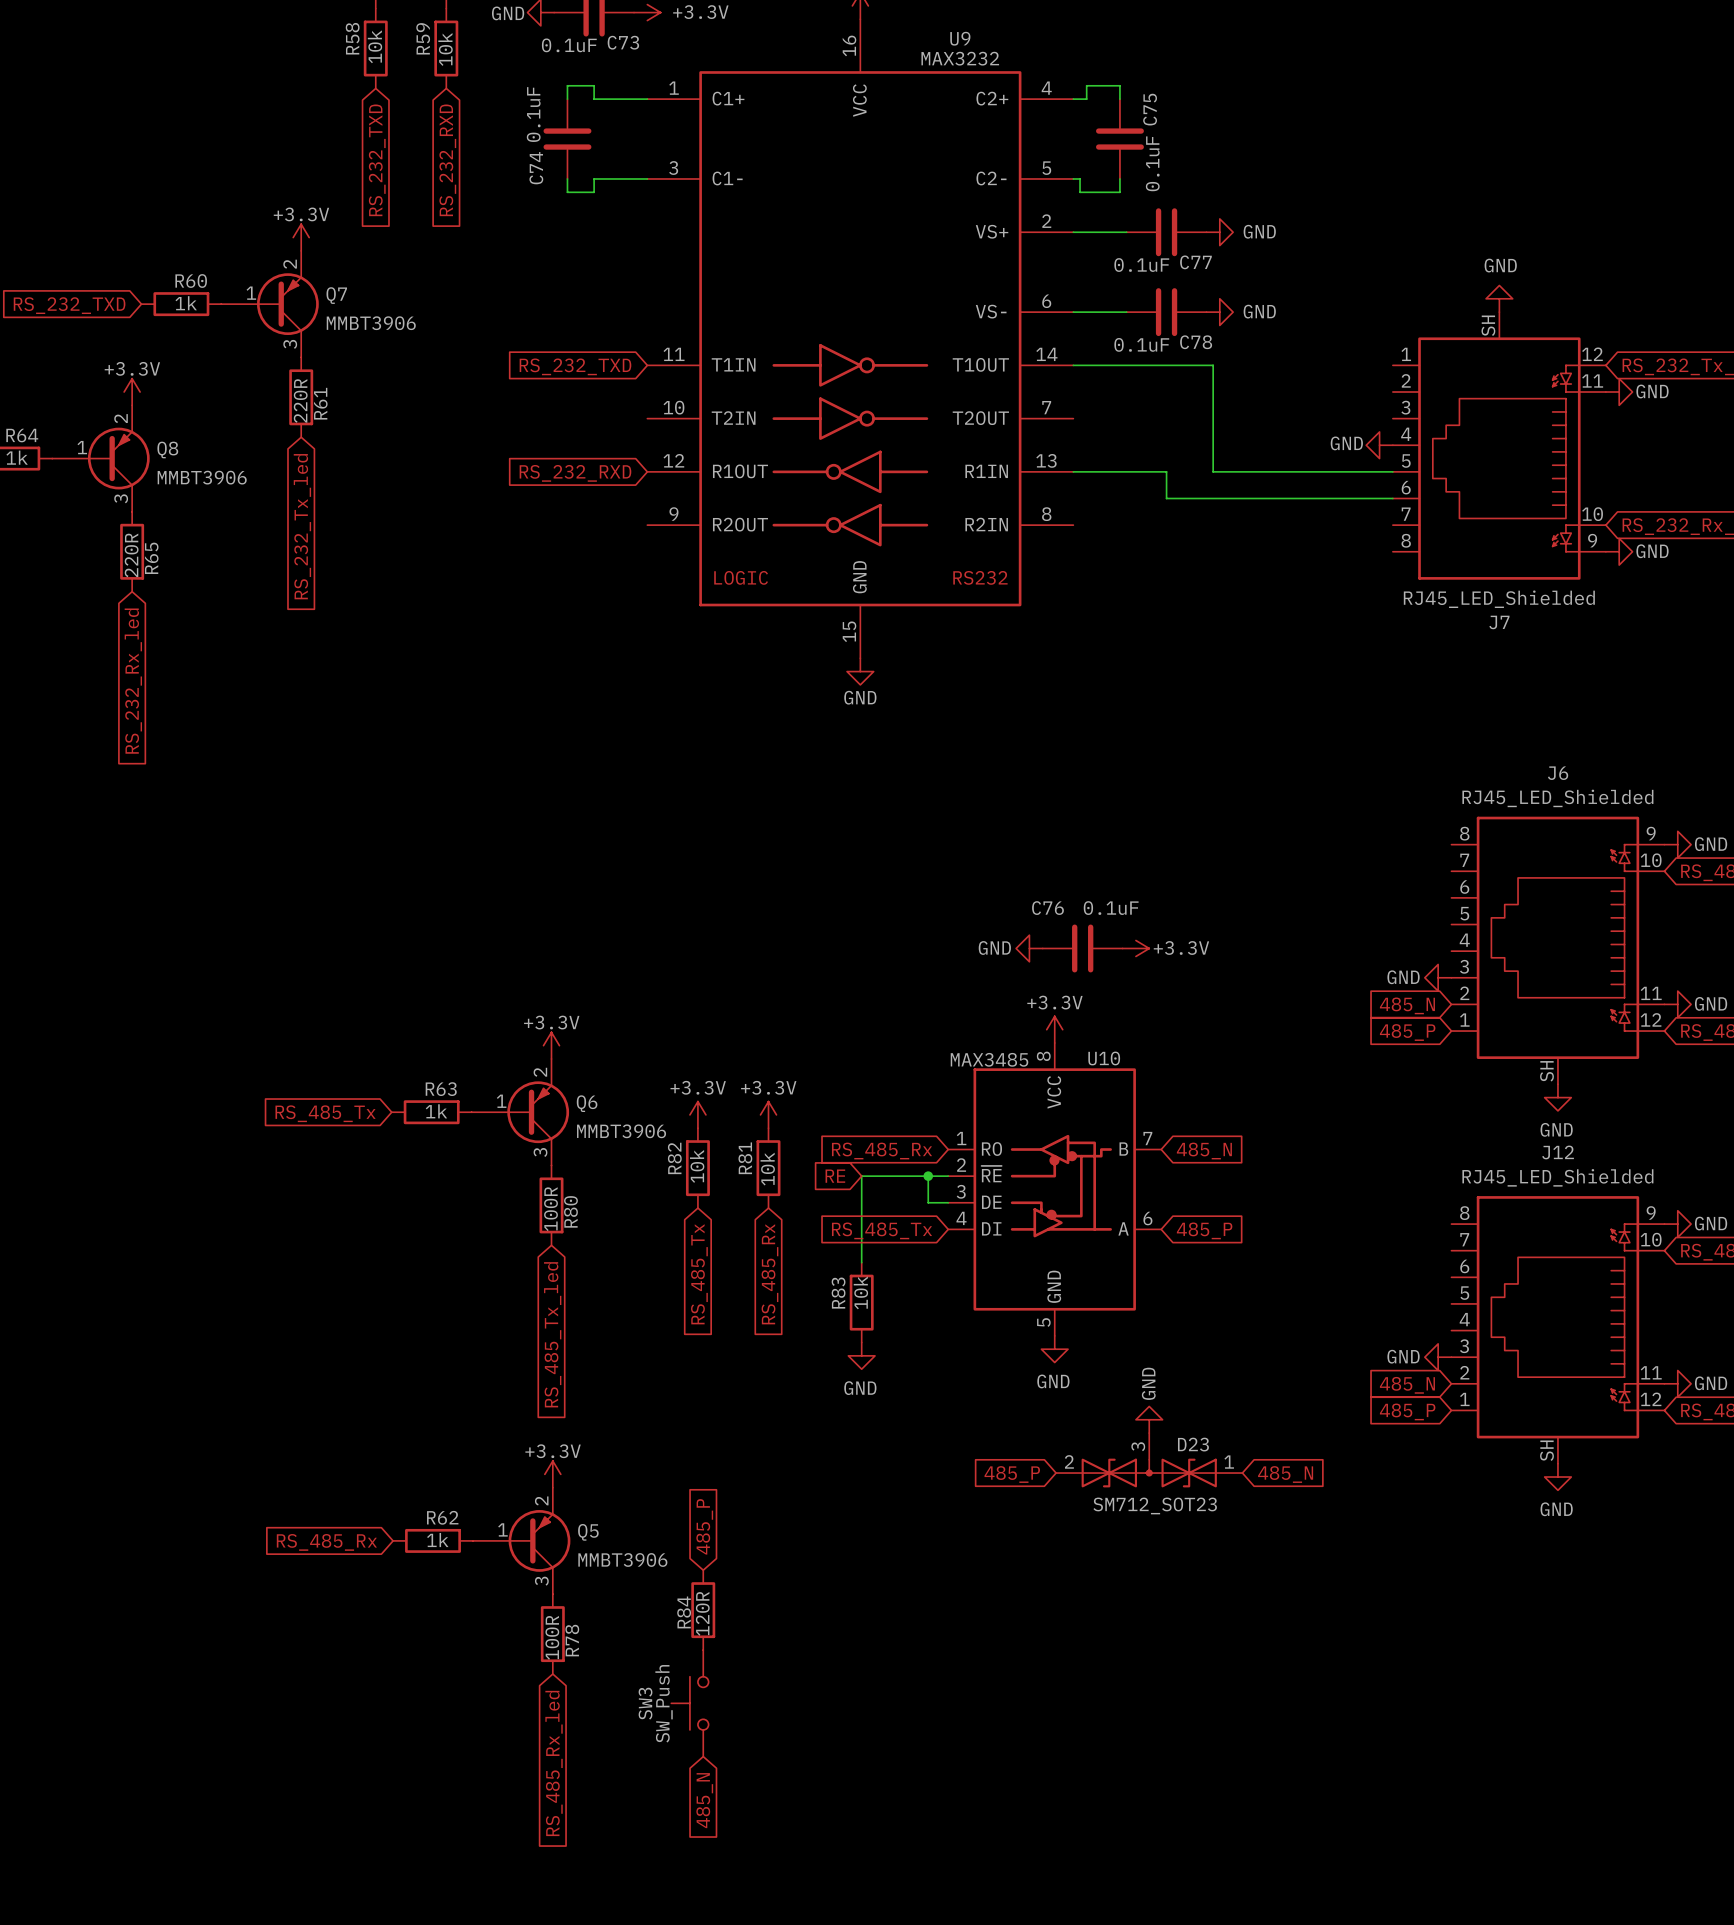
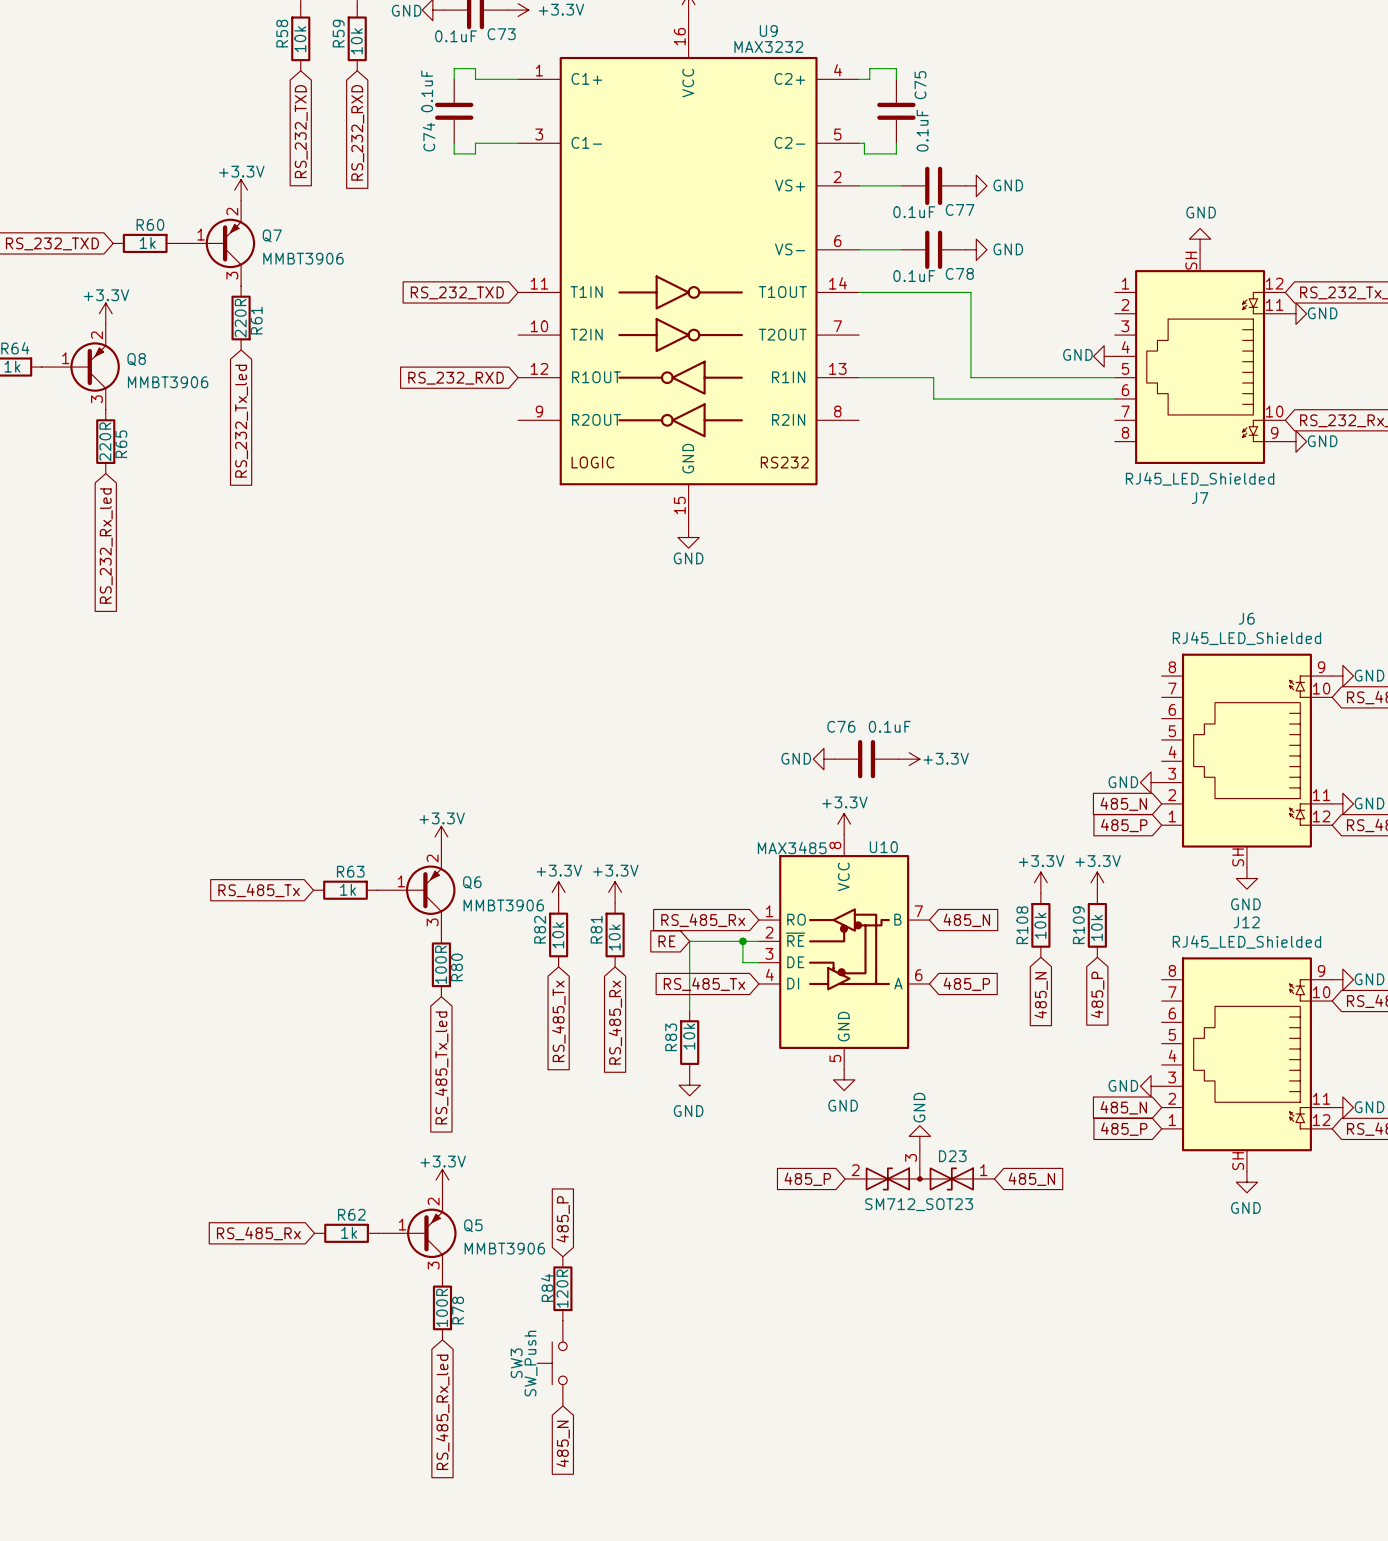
power symbol: none -> +3.3V (1040, 882)
power symbol: none -> +3.3V (1097, 882)
R108: none -> 10k (1040, 925)
R109: none -> 10k (1097, 925)
global label: none -> 485_P (1097, 994)
global label: none -> 485_N (1041, 995)

